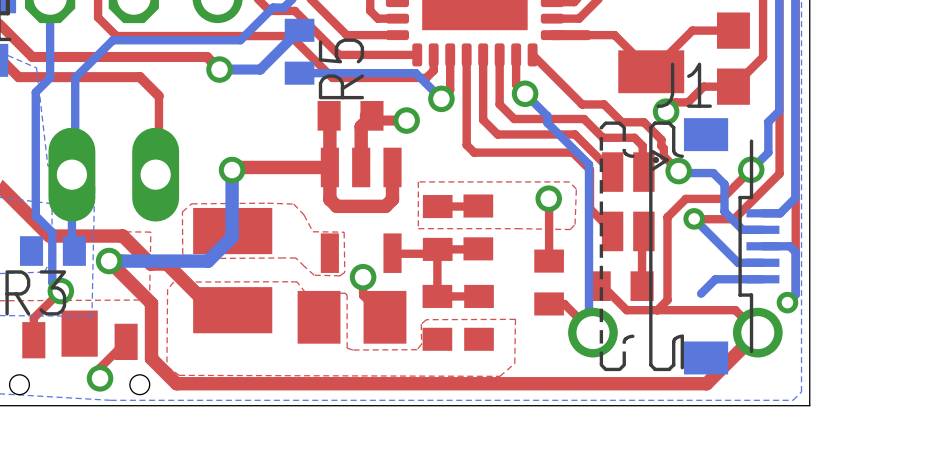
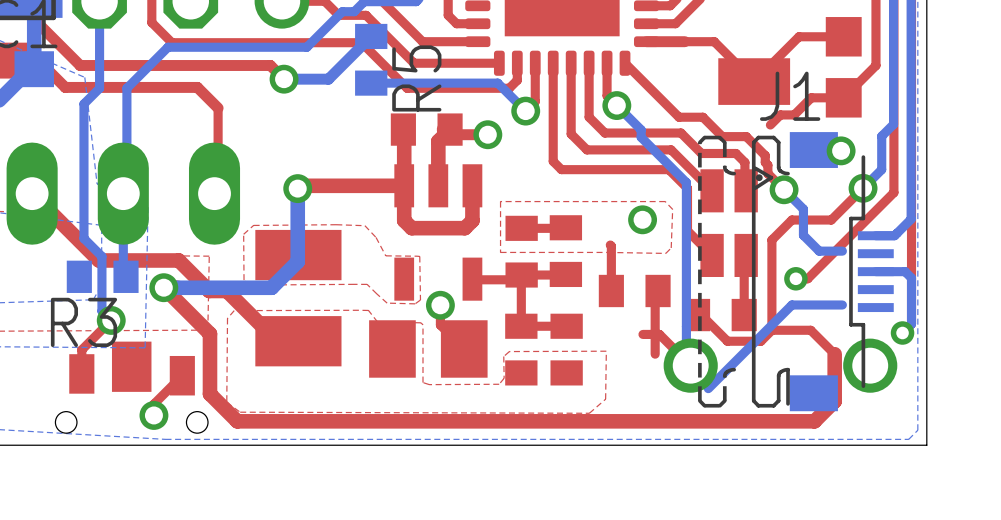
via position: (666, 111) -> (841, 150)
bottom track: (680, 173) (713, 173) (724, 184) (724, 211) (742, 229) (762, 229) -> (786, 191) (803, 209) (803, 235) (819, 251) (842, 251)
top track: (549, 199) (549, 261) -> none
bottom track: (688, 218) (694, 218) (738, 262) (762, 262) -> none
via position: (694, 218) -> (795, 278)
top track: (734, 219) (694, 219) -> (844, 242) (807, 278) (795, 278)
top track: none -> (610, 245) (611, 290)
top track: none -> (658, 290) (655, 293) (655, 354)
bottom track: none -> (842, 304) (791, 304) (708, 388)
bottom track: (762, 279) (715, 279) (701, 293) -> none
part rotation: 0° (549, 282) -> 90° clockwise (634, 290)
top track: (657, 310) (735, 310) (757, 332) (725, 365) -> (771, 330) (810, 330) (834, 354) (834, 401)

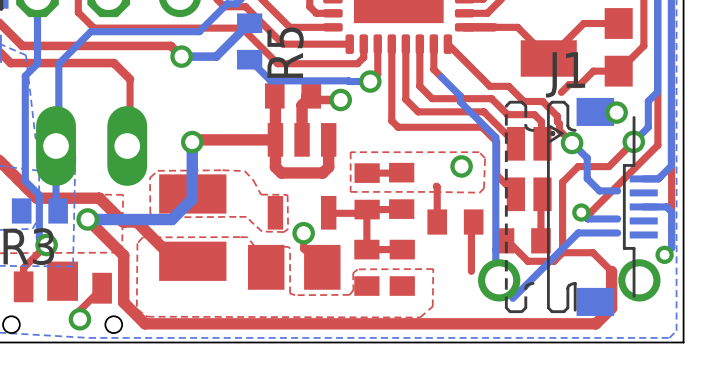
bottom track: (371, 83) (497, 83) (525, 111) -> (249, 59) (270, 80) (370, 81)
via: (616, 105) -> none
bottom track: none -> (581, 212) (587, 218) (617, 218)
top track: (642, 334) (659, 334) (690, 365) -> none

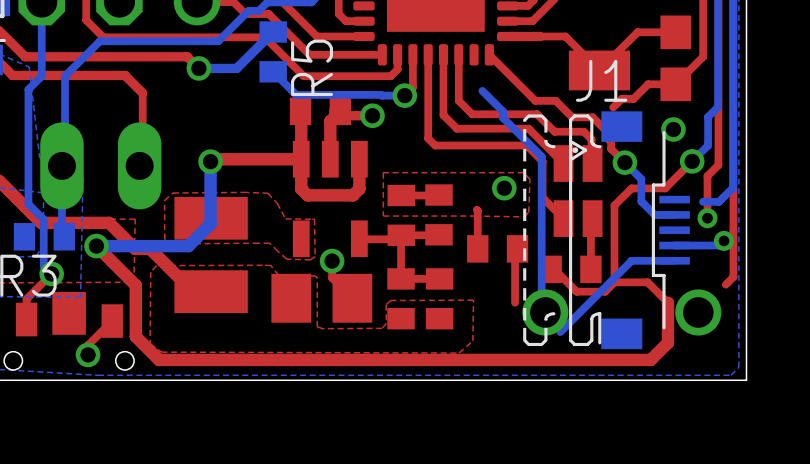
top track: (433, 44) (433, 69) (441, 77) -> none
top track: (647, 155) (590, 212) (581, 212) -> (707, 176) (707, 218)
via: none -> (707, 218)
J1 position: (581, 206) -> (606, 230)
bottom track: (643, 206) (666, 206) (671, 211) (671, 247) (664, 254) -> none
bottom track: (581, 212) (587, 218) (617, 218) -> (723, 240) (719, 245) (674, 245)
via: (581, 212) -> none
via: none -> (723, 240)
via: (664, 254) -> none

